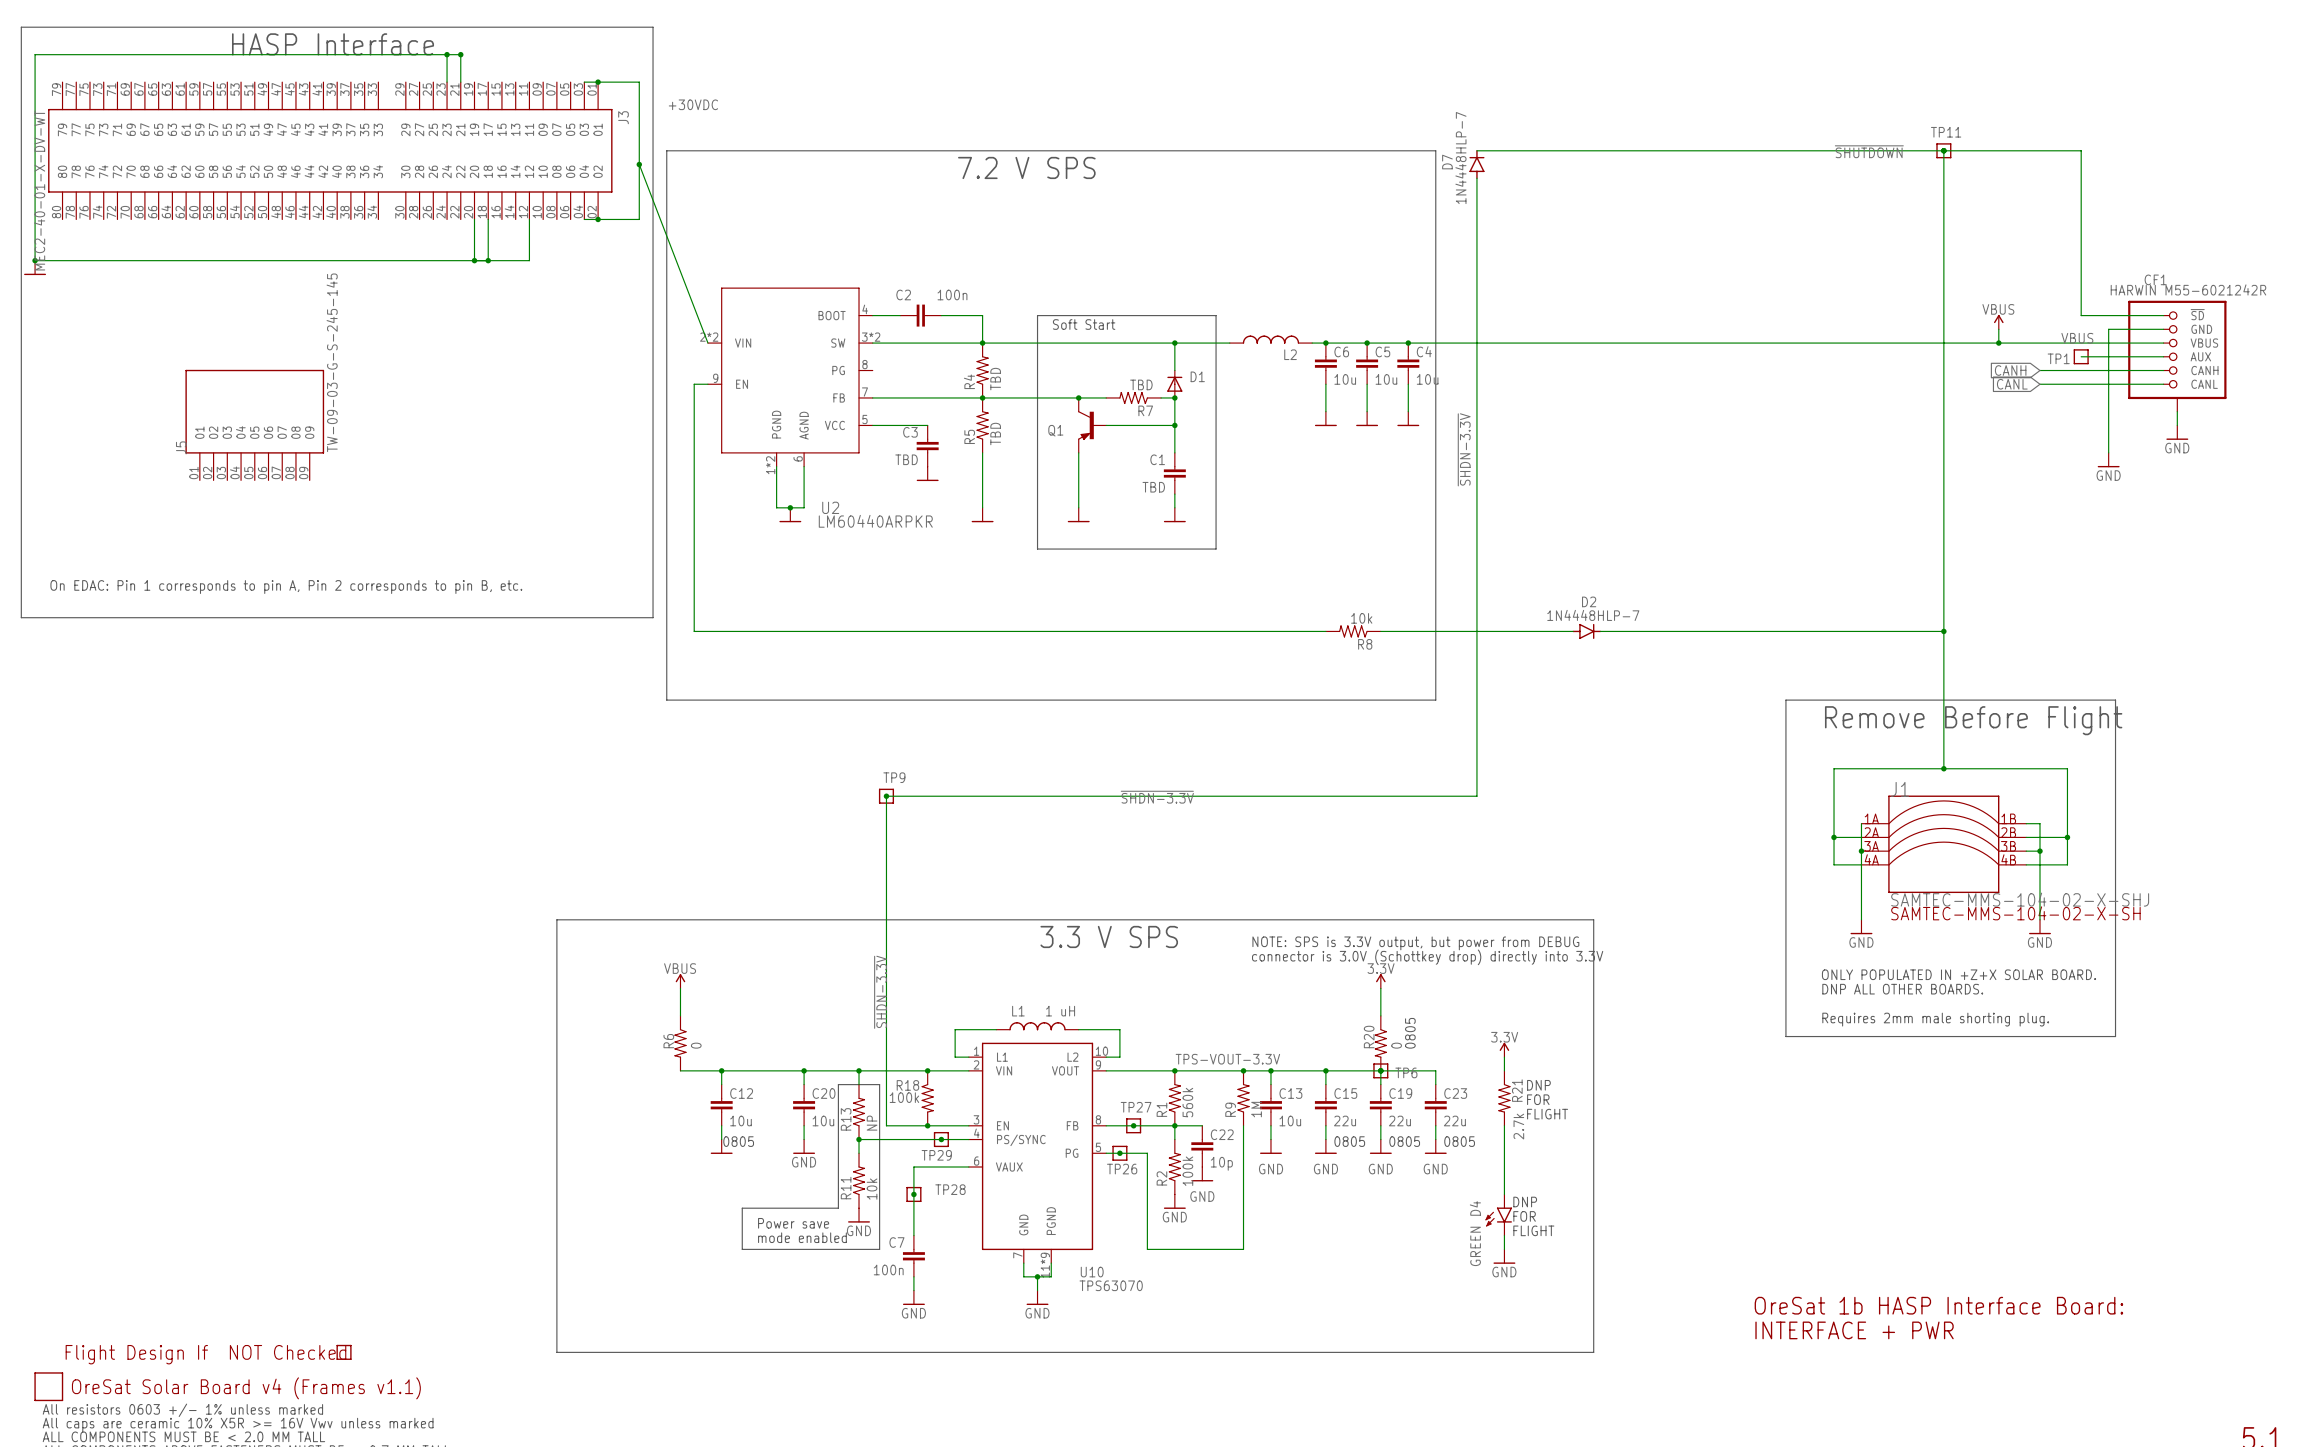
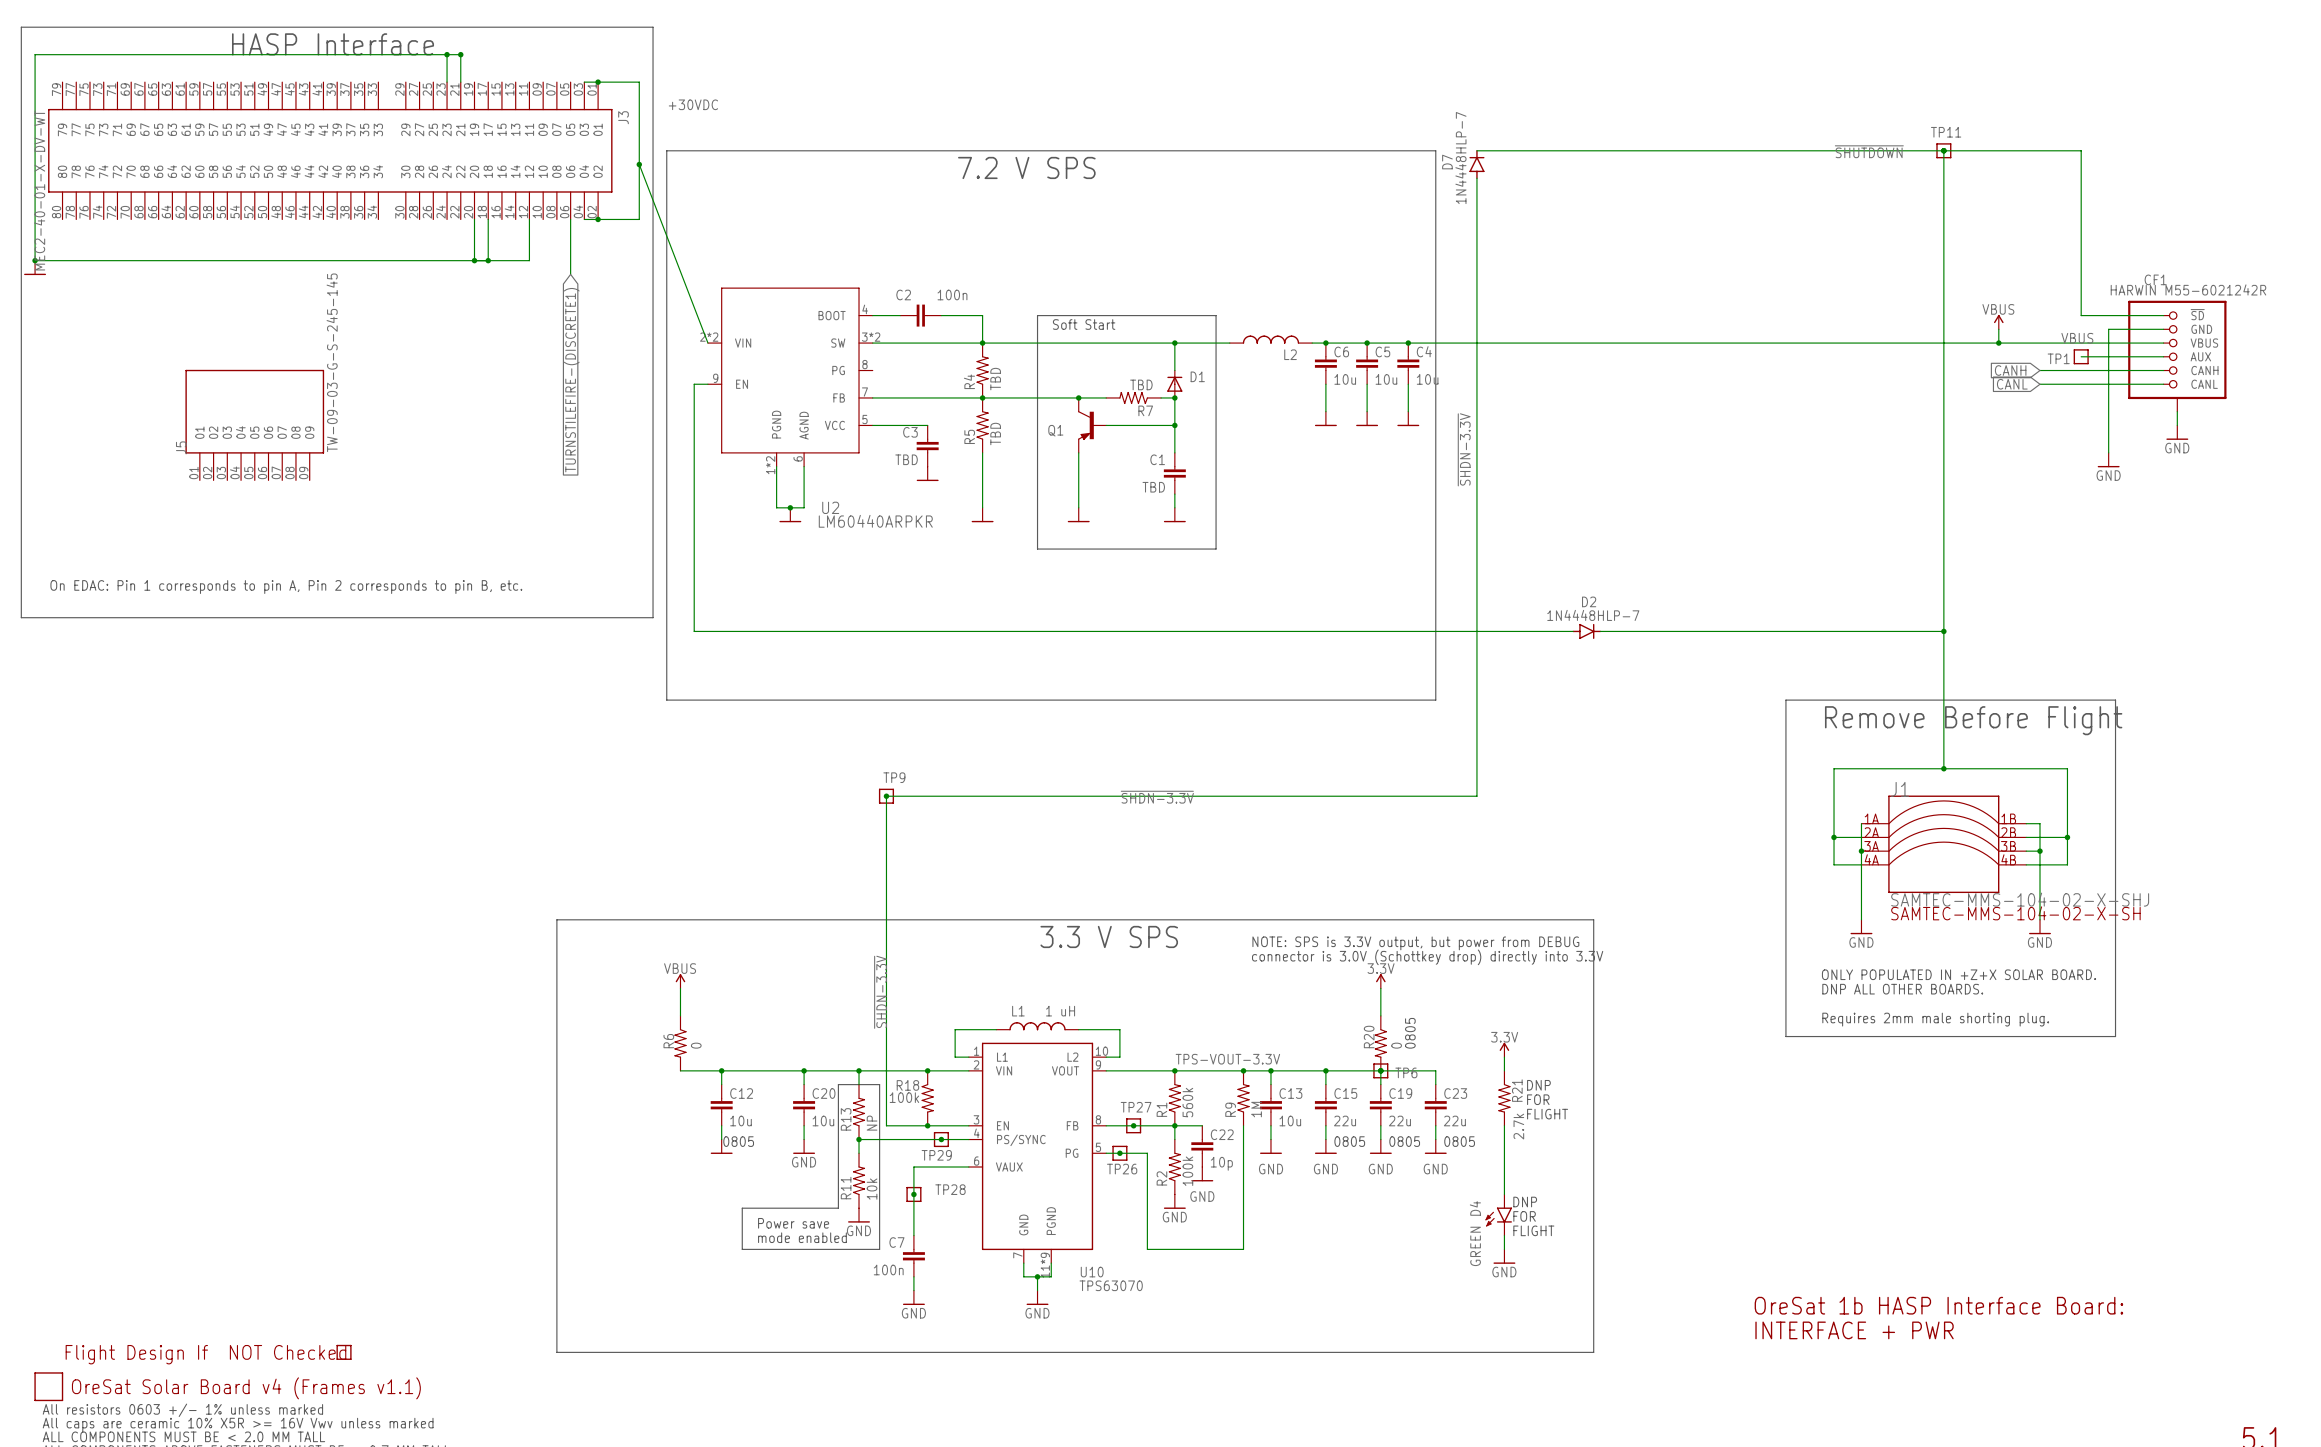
wire: none -> (570, 219) (570, 274)
global label: none -> TURNSTILEFIRE-(DISCRETE1) (571, 380)
R8: 10k (1353, 631) -> none

